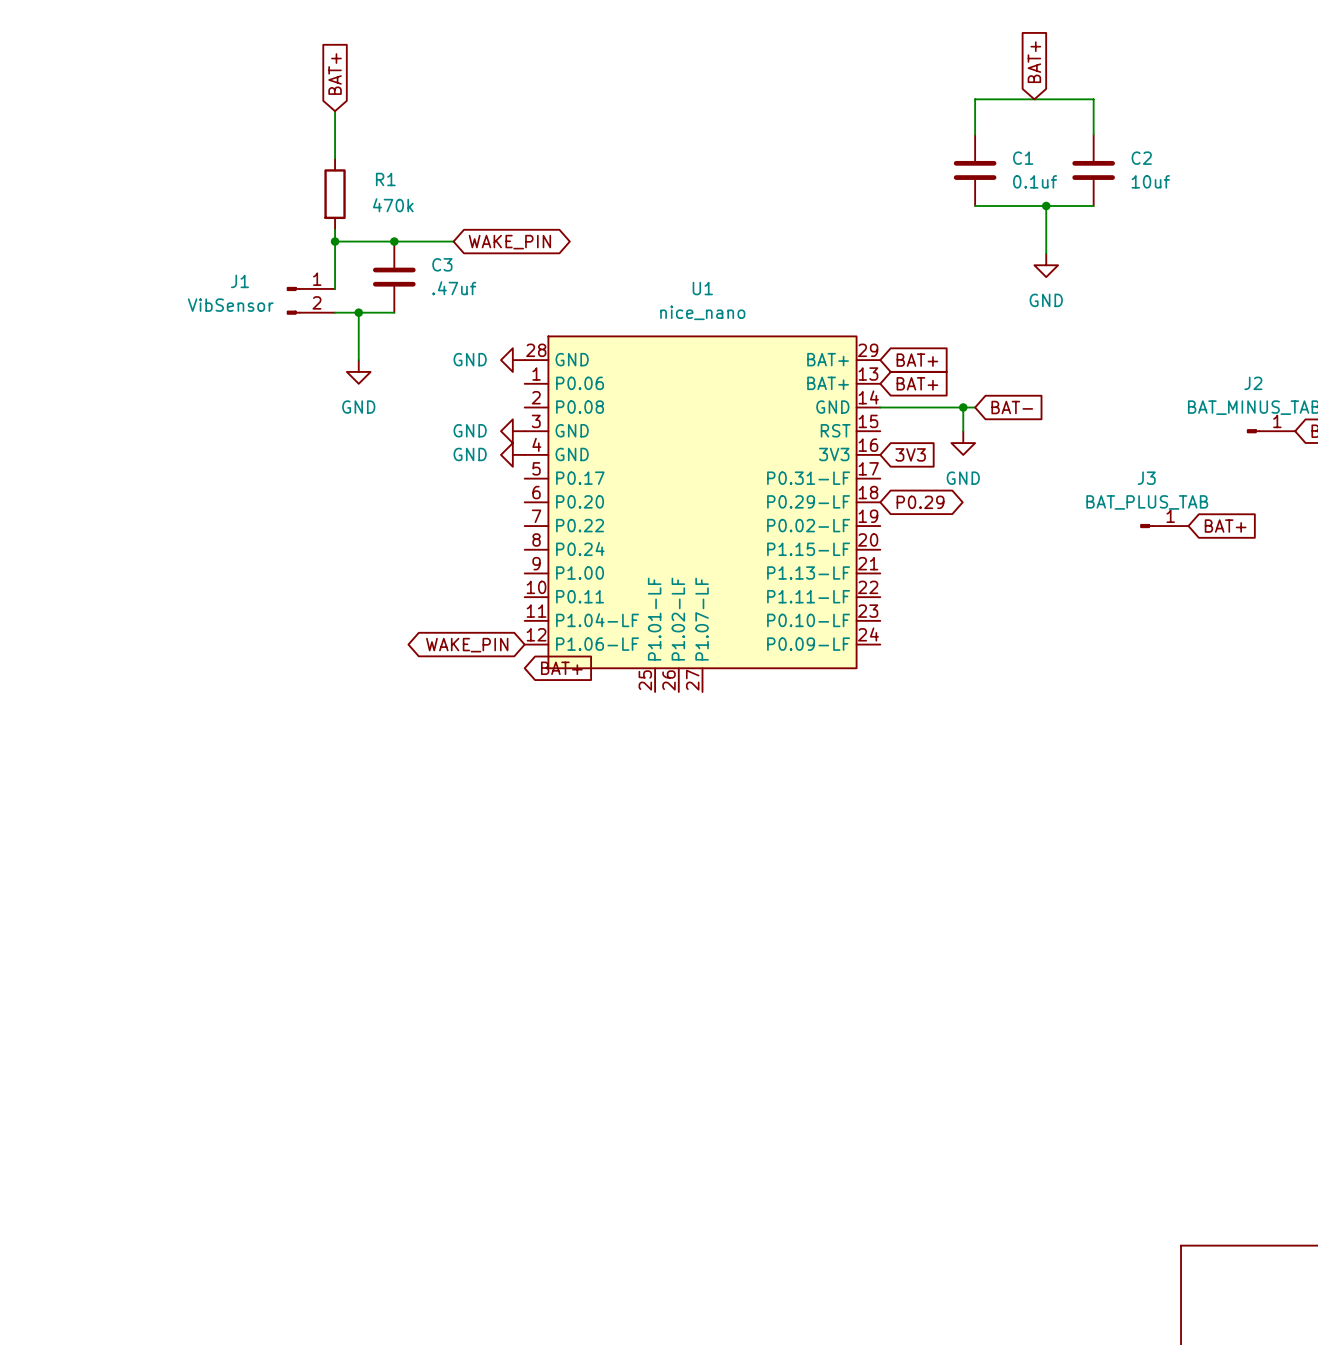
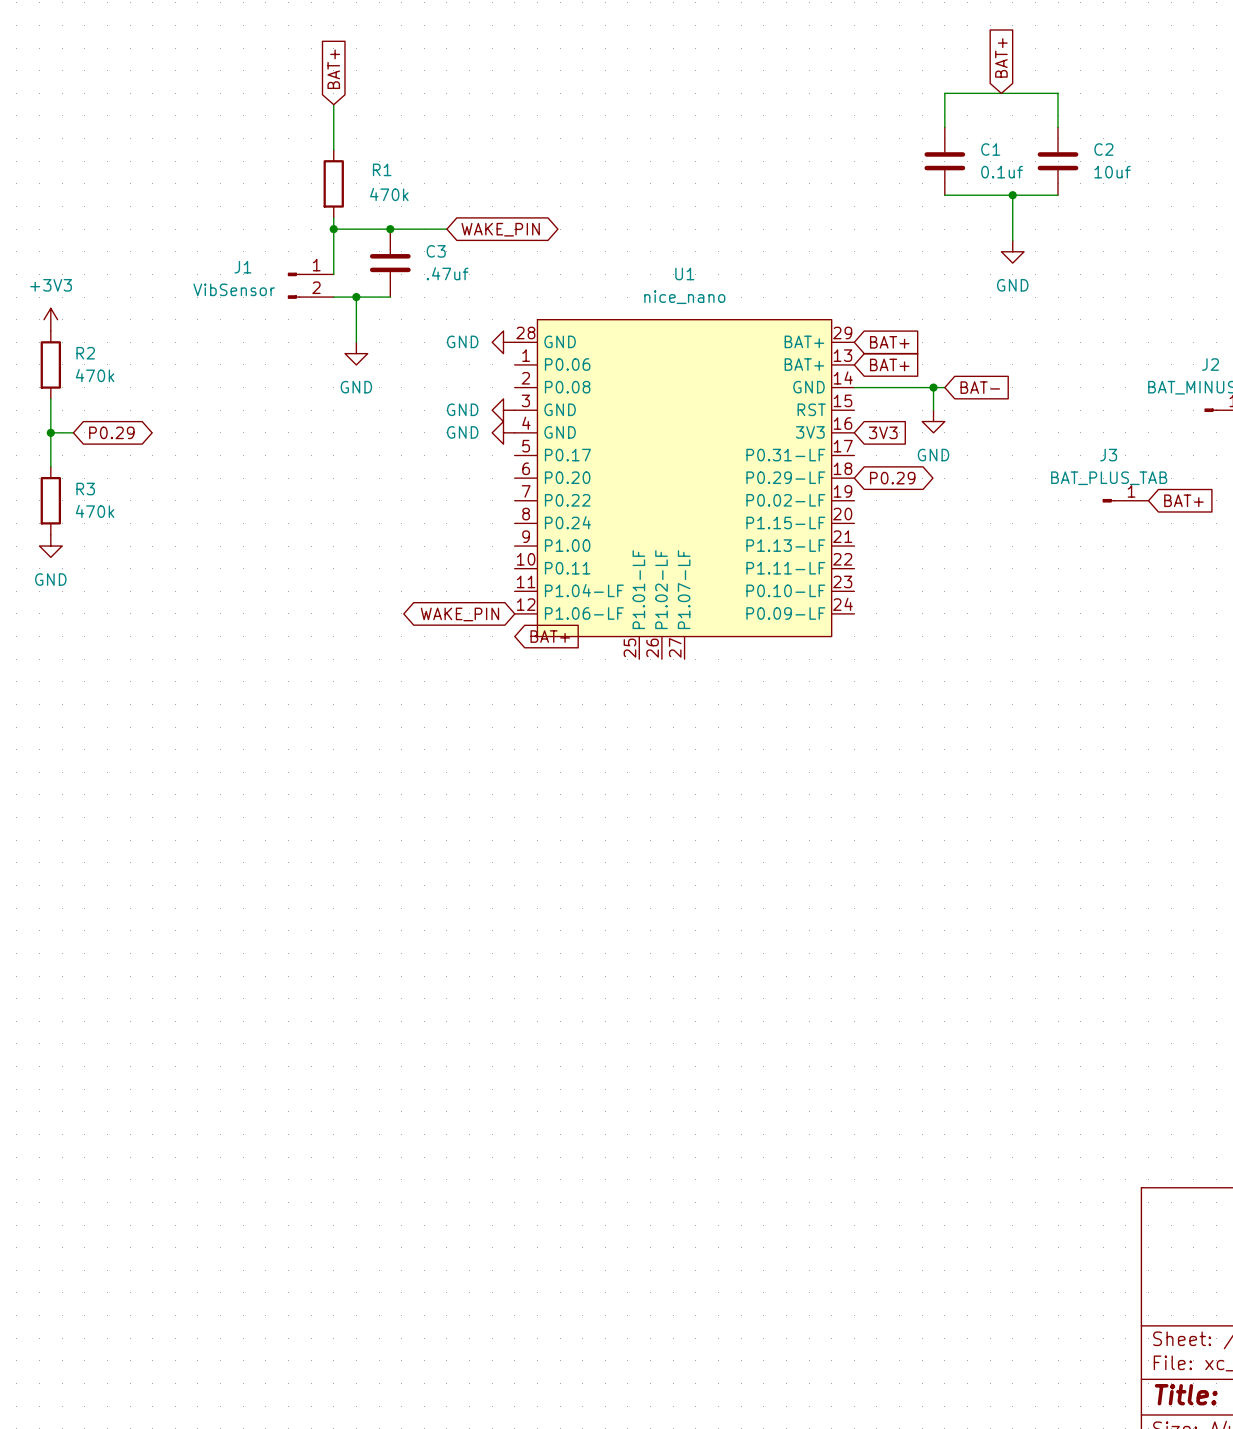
power symbol: none -> +3V3 (50, 319)
R2: none -> 470k (50, 364)
wire: none -> (50, 398) (50, 466)
wire: none -> (50, 432) (73, 432)
junction: none -> (50, 432)
global label: none -> P0.29 (111, 432)
R3: none -> 470k (50, 500)
power symbol: none -> GND (50, 546)

